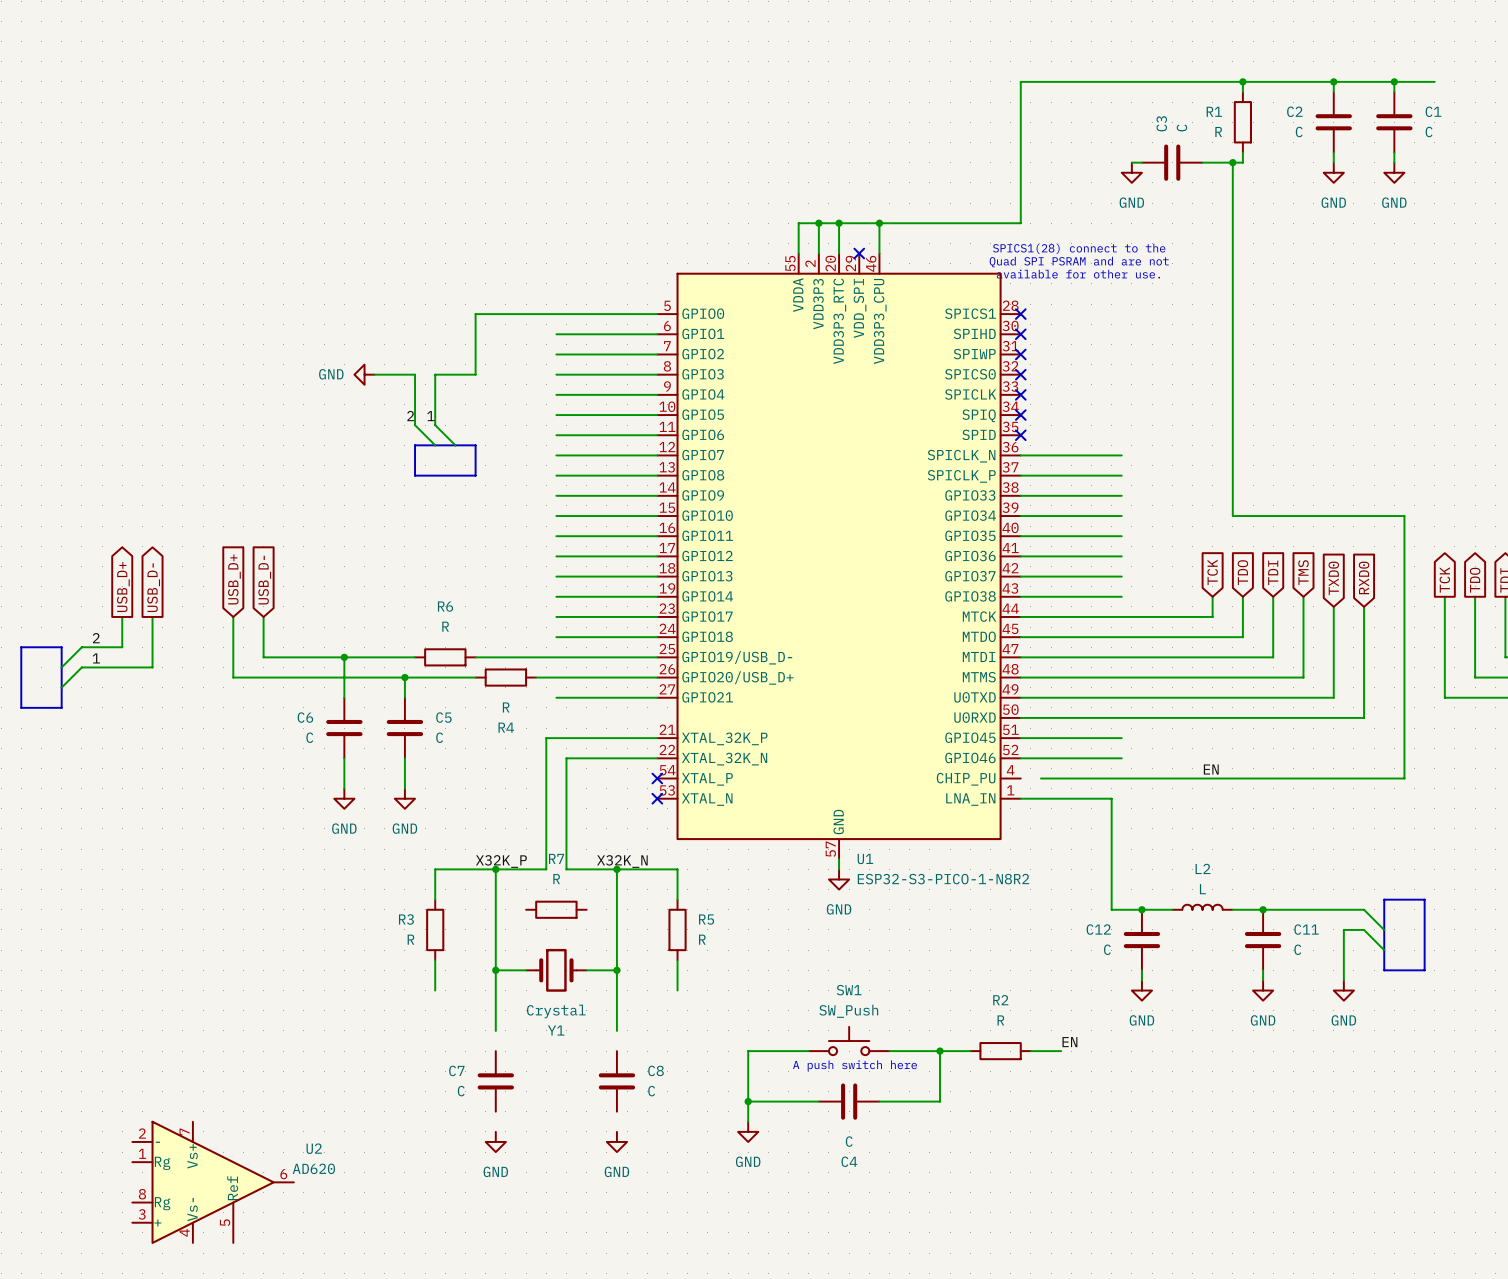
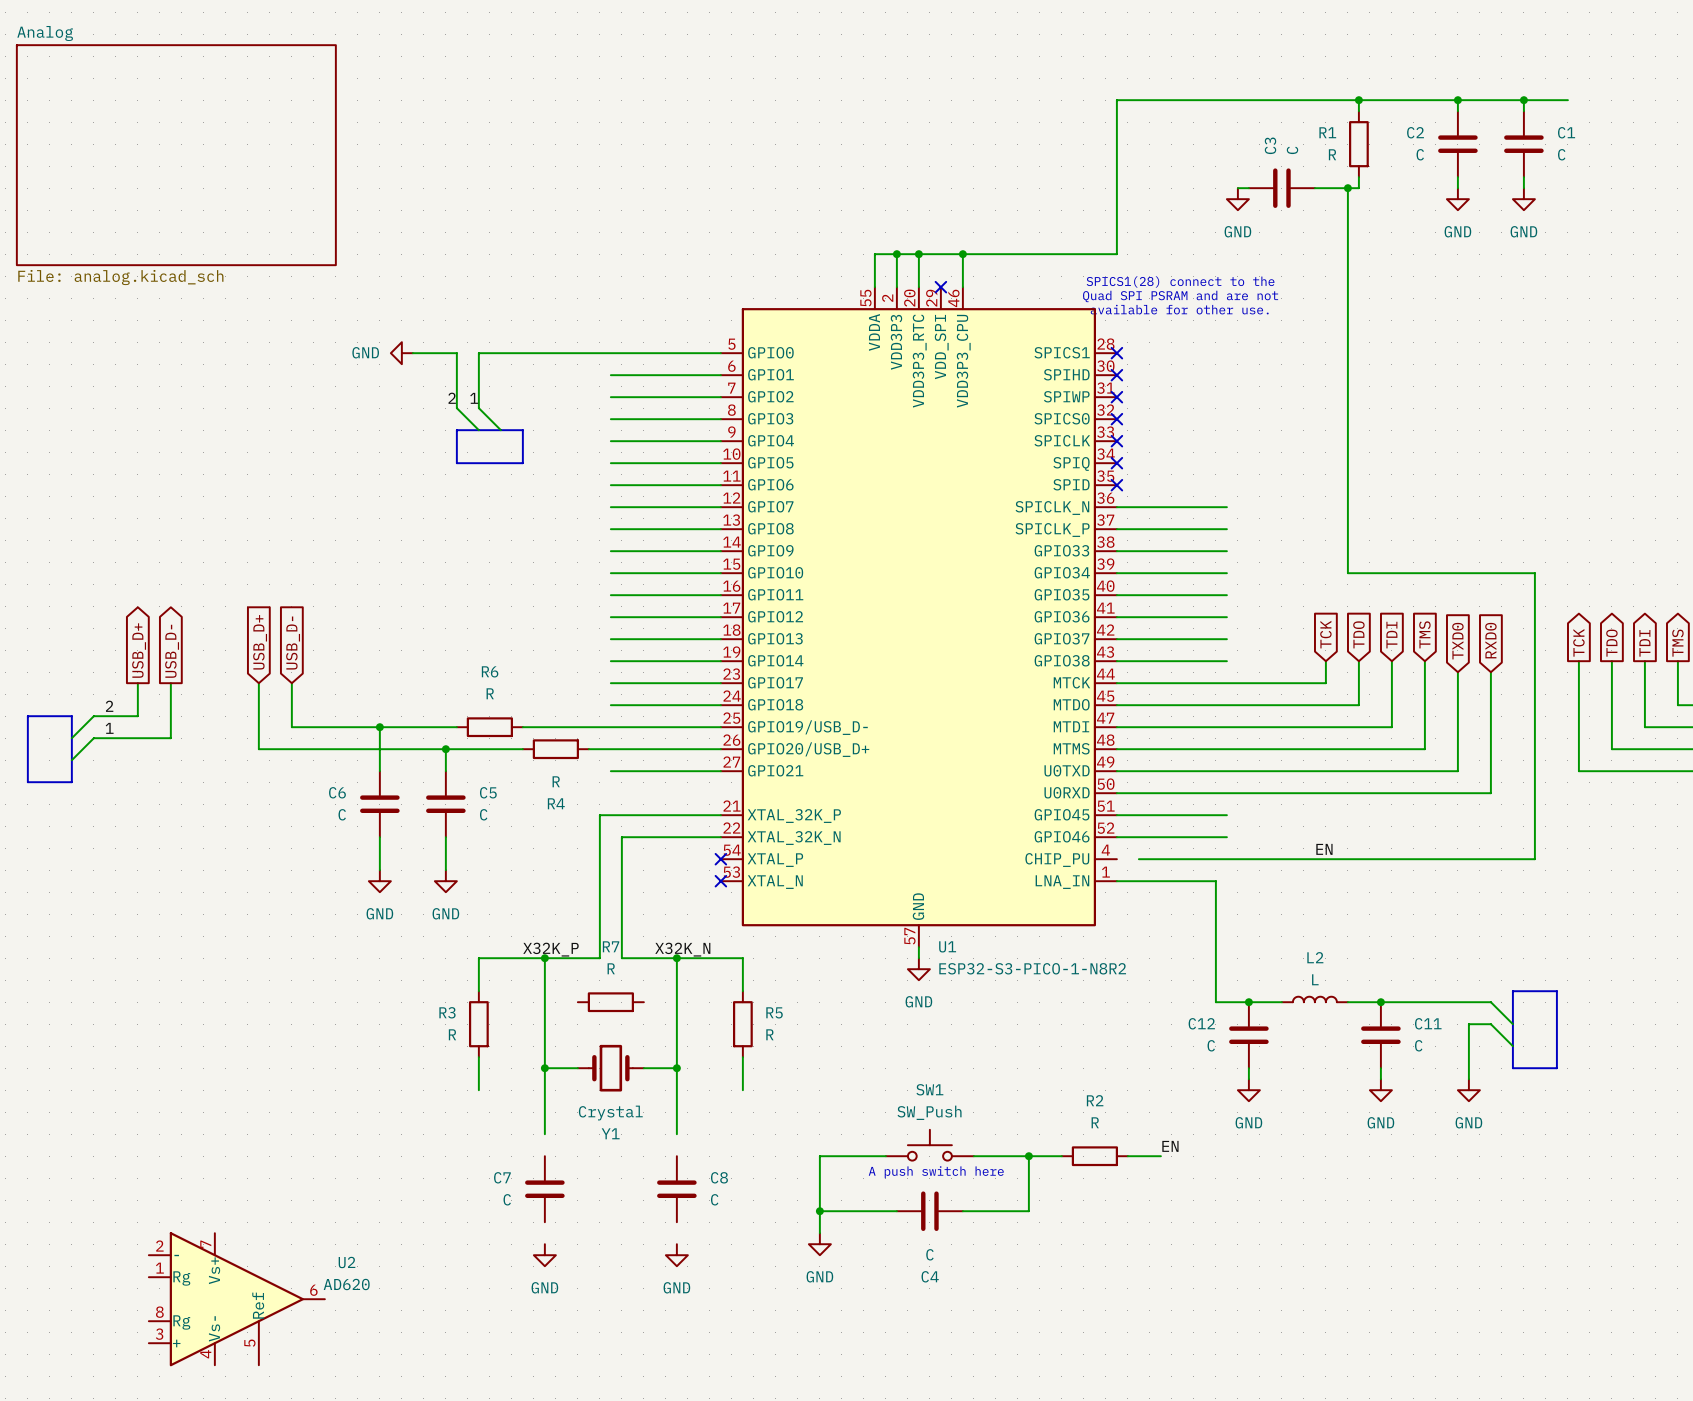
sheet Analog: none -> File: analog.kicad_sch (176, 155)
wire: (475, 314) (475, 374) (435, 374) (435, 425) (455, 445) -> (522, 353) (478, 353) (478, 408) (500, 430)
power symbol position: GND (364, 374) -> GND (401, 353)
wire: (374, 374) (415, 374) (415, 425) (435, 445) -> (412, 353) (456, 353) (456, 408) (478, 430)
label position: 2 (410, 416) -> 2 (452, 398)
label position: 1 (430, 416) -> 1 (474, 398)
bus: (415, 445) (475, 445) (475, 475) (415, 475) (415, 445) -> (456, 430) (522, 430) (522, 463) (456, 463) (456, 430)

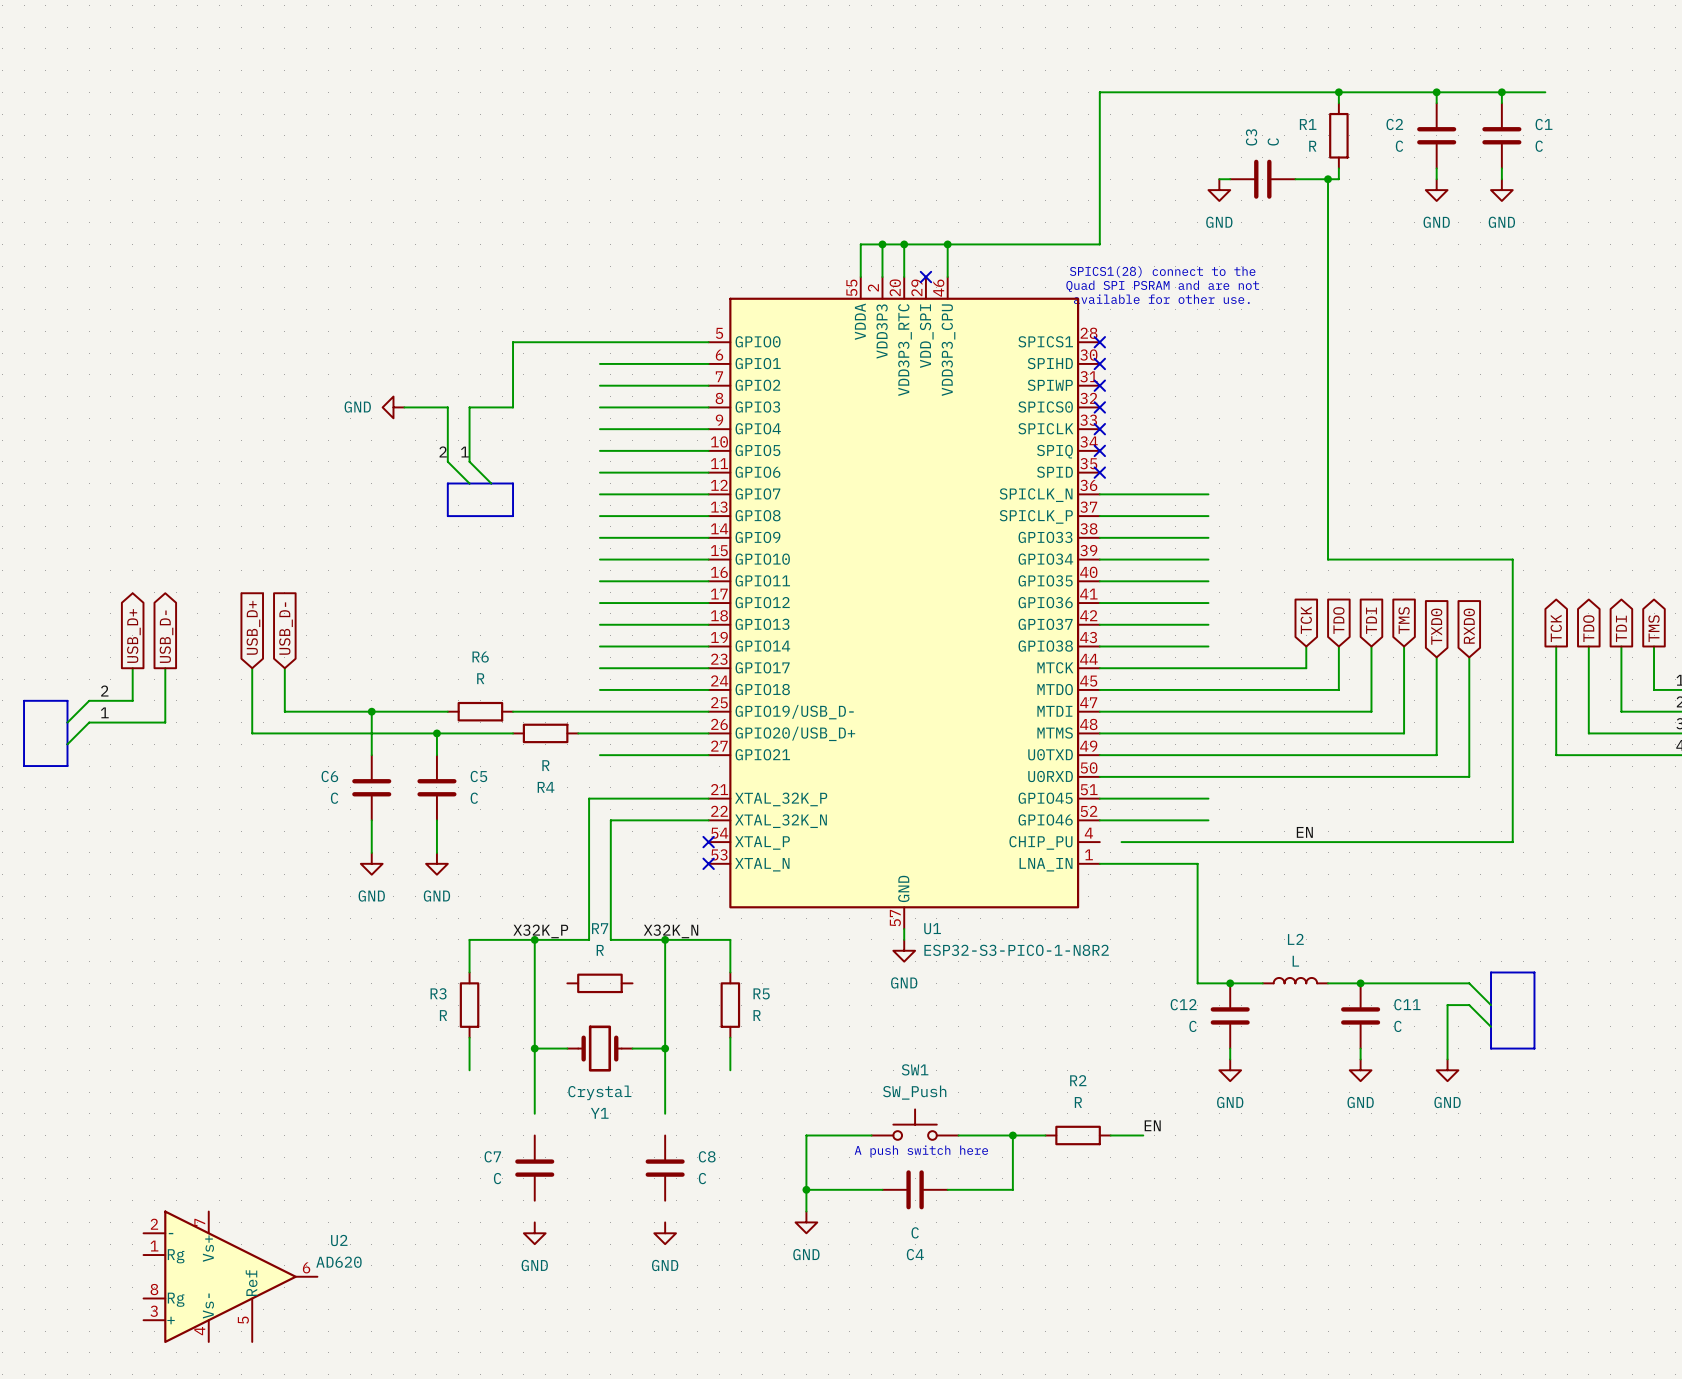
sheet Analog: File: analog.kicad_sch (176, 155) -> none
power symbol position: GND (401, 353) -> GND (393, 407)
wire: (412, 353) (456, 353) (456, 408) (478, 430) -> (404, 407) (447, 407) (447, 461) (469, 483)
wire: (522, 353) (478, 353) (478, 408) (500, 430) -> (513, 342) (513, 407) (469, 407) (469, 461) (491, 483)
label position: 2 (452, 398) -> 2 (443, 451)
label position: 1 (474, 398) -> 1 (464, 452)
bus: (456, 430) (522, 430) (522, 463) (456, 463) (456, 430) -> (447, 483) (513, 483) (513, 516) (447, 516) (447, 483)

